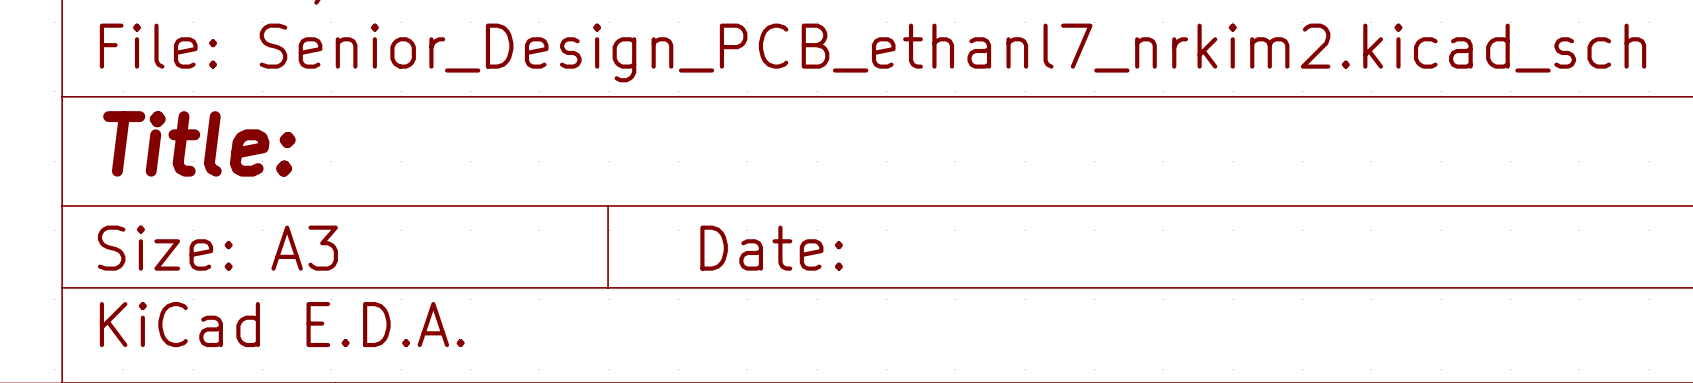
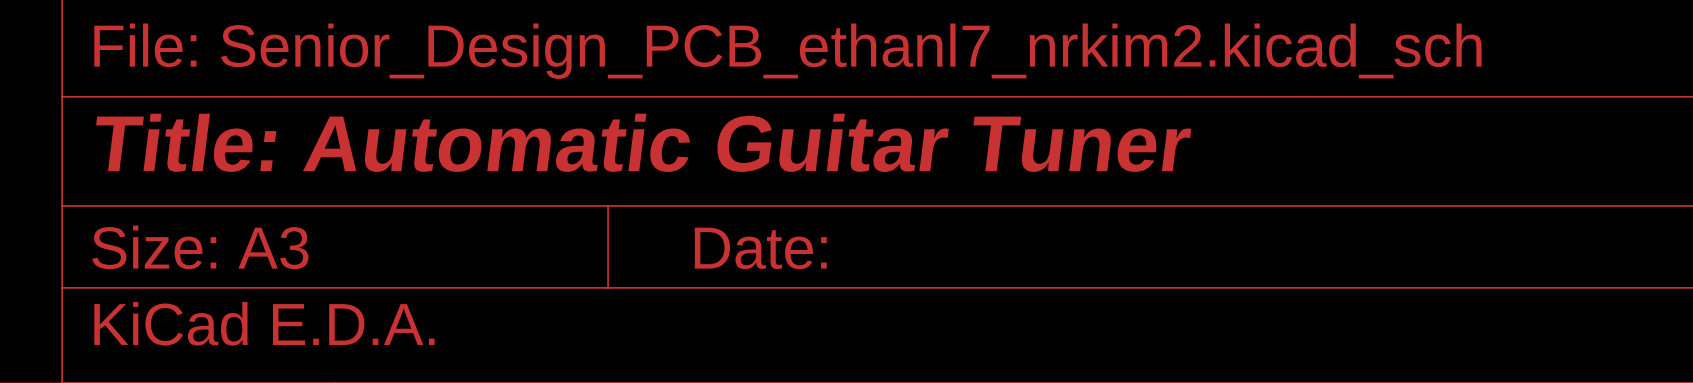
title block: Title: (199, 143) -> Title: Automatic Guitar Tuner (643, 142)

